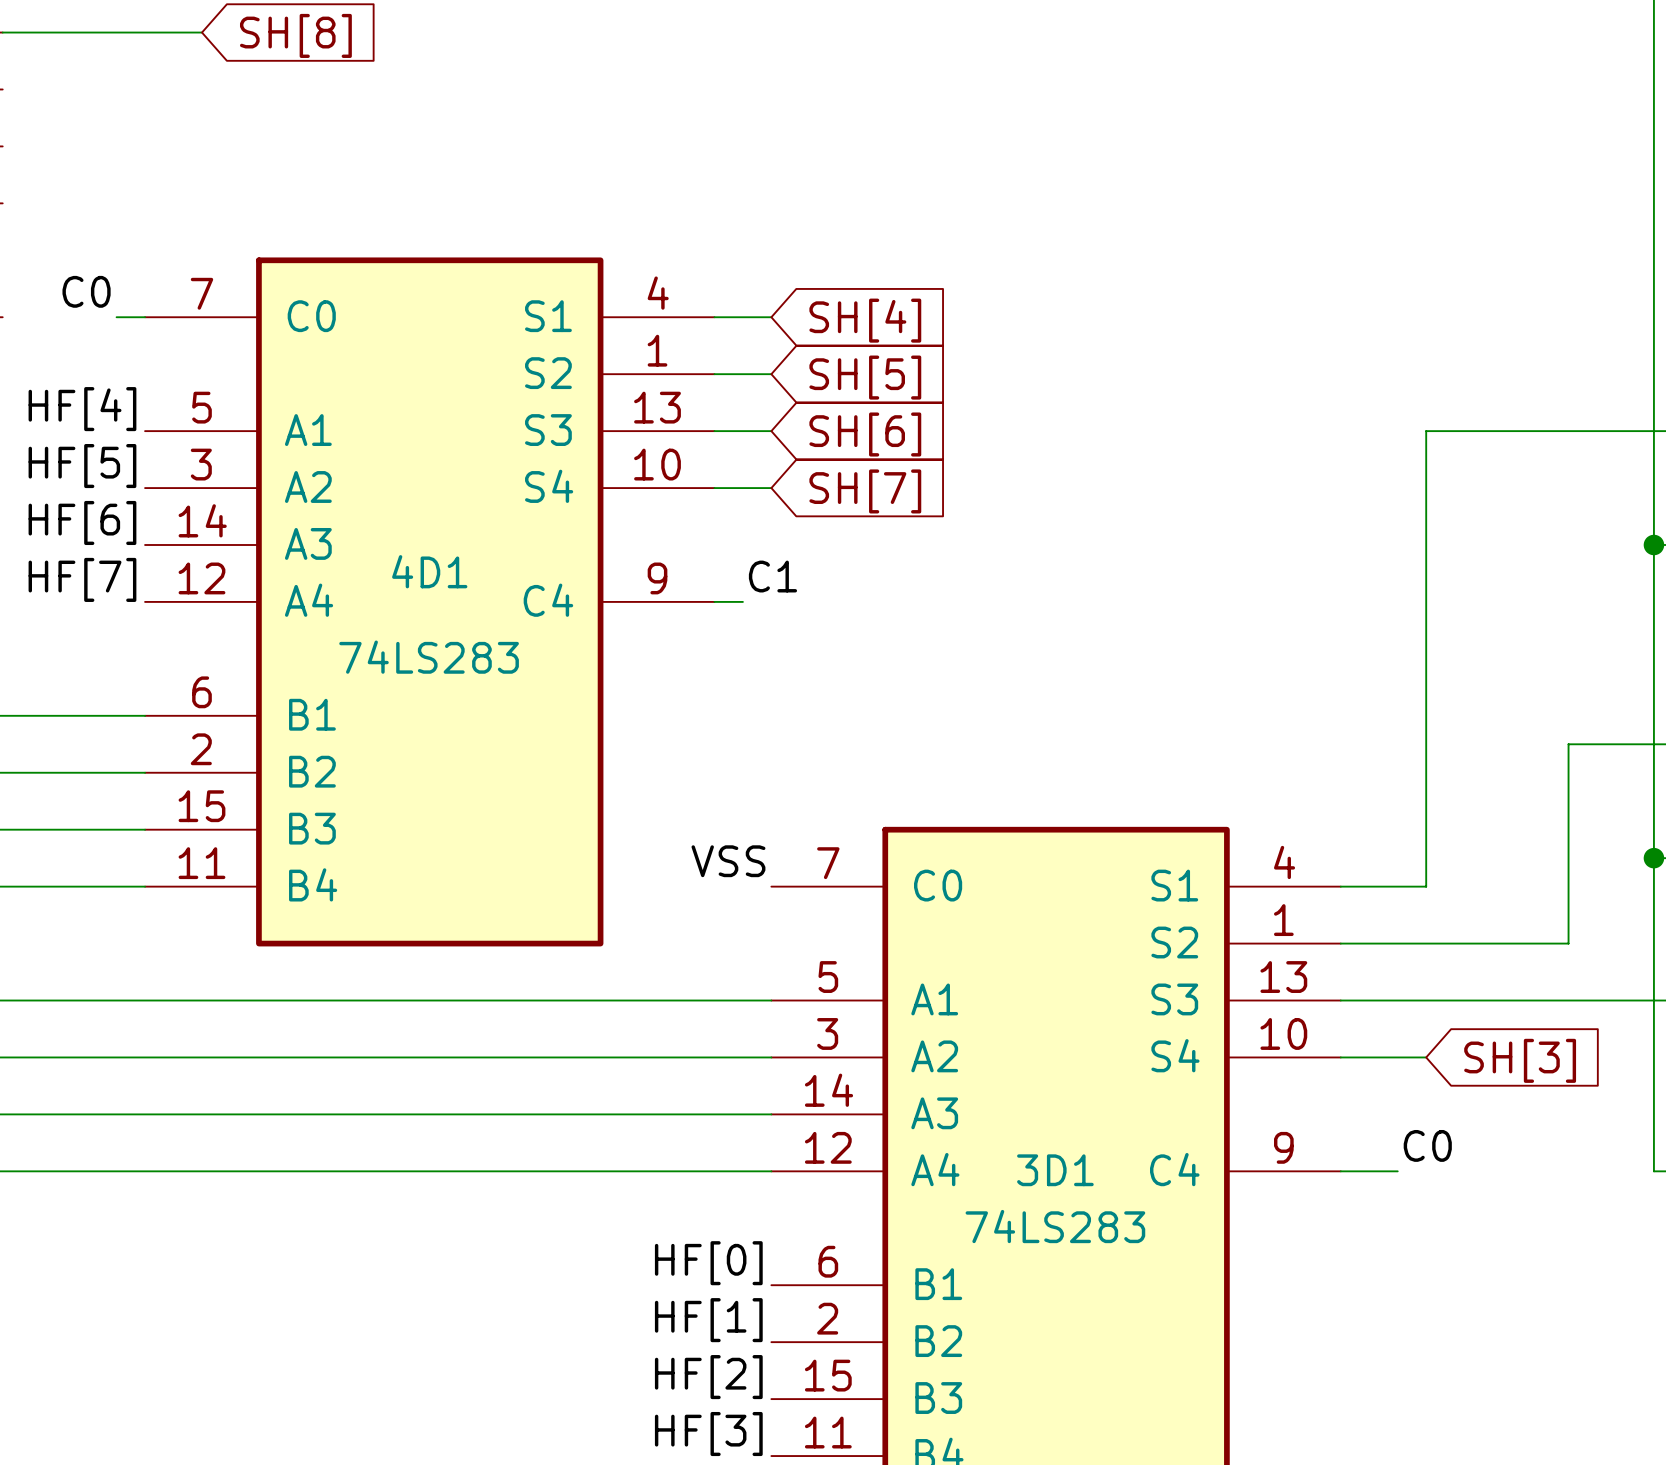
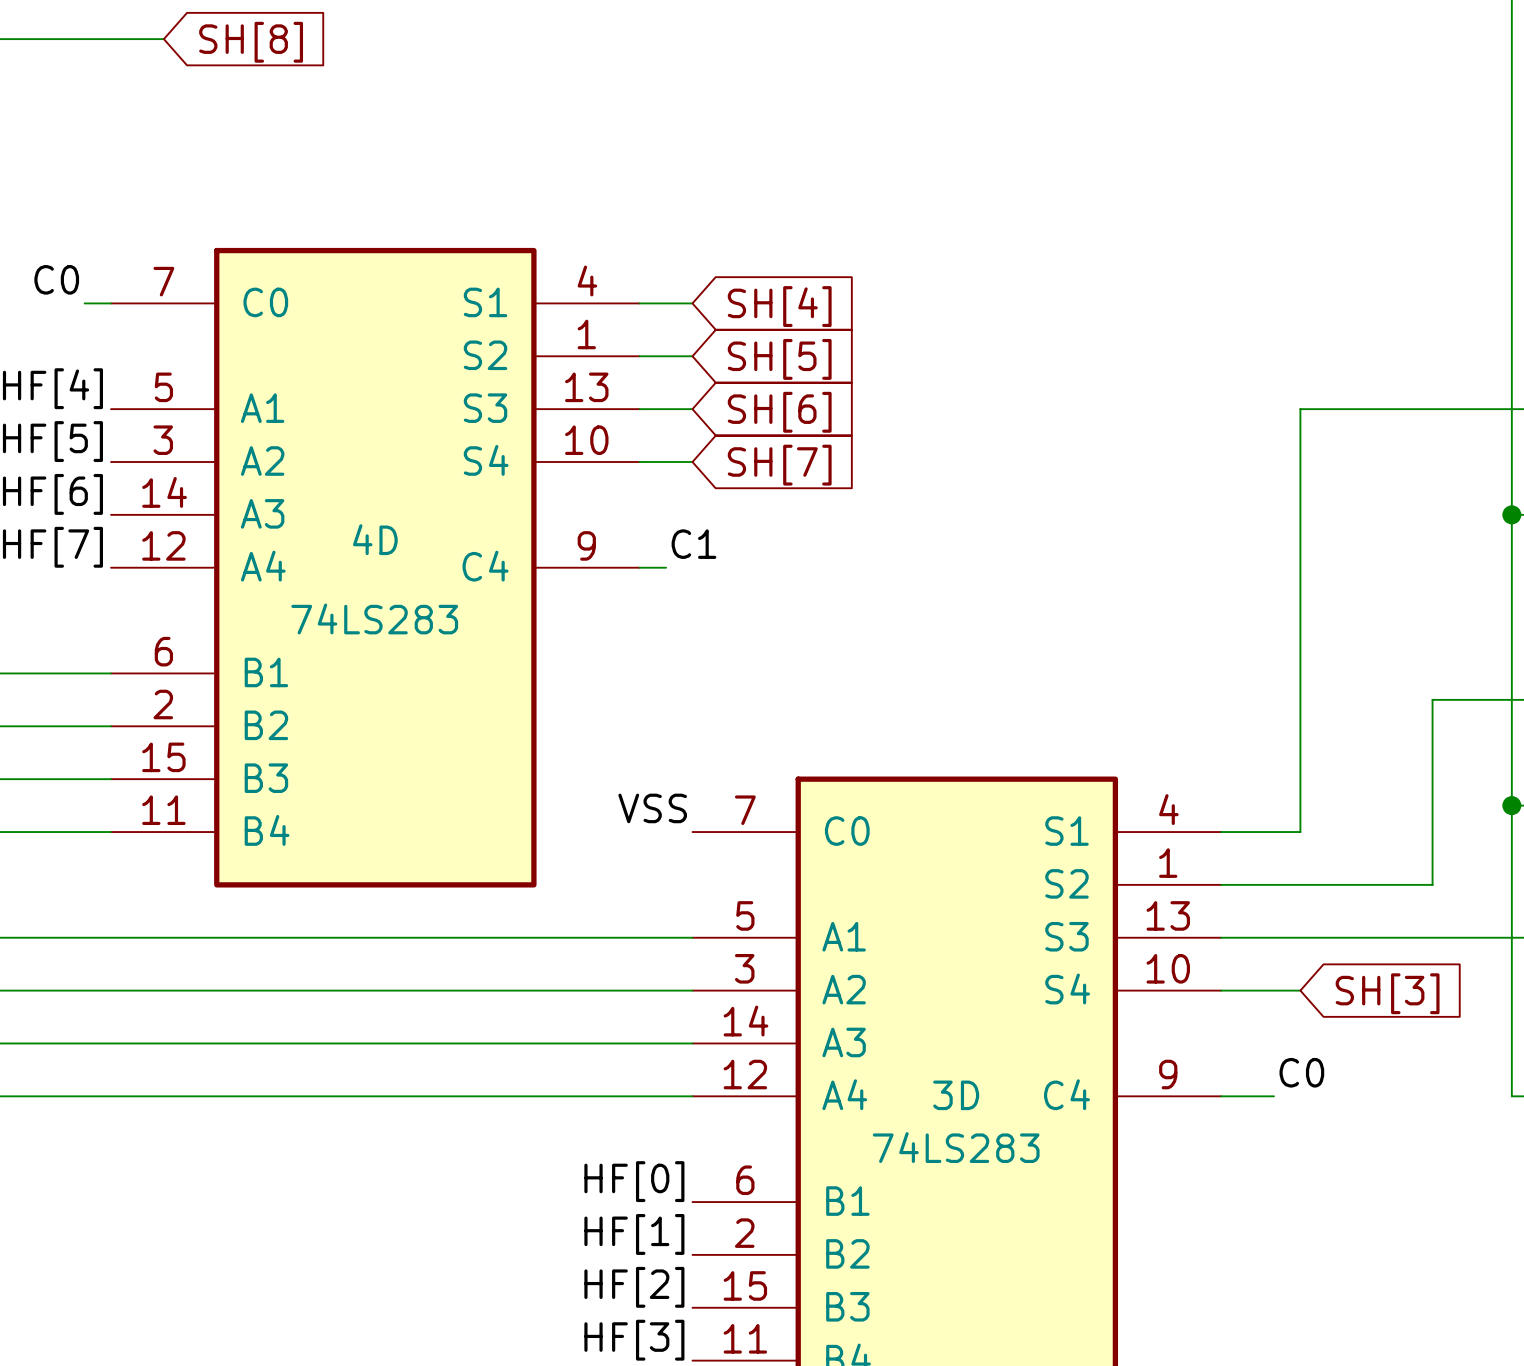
4D1 name: 4D1 (429, 571) -> 4D (375, 539)
3D1 name: 3D1 (1055, 1170) -> 3D (956, 1095)

